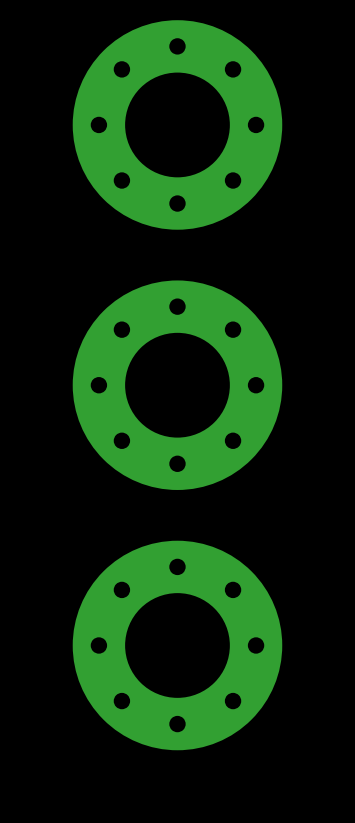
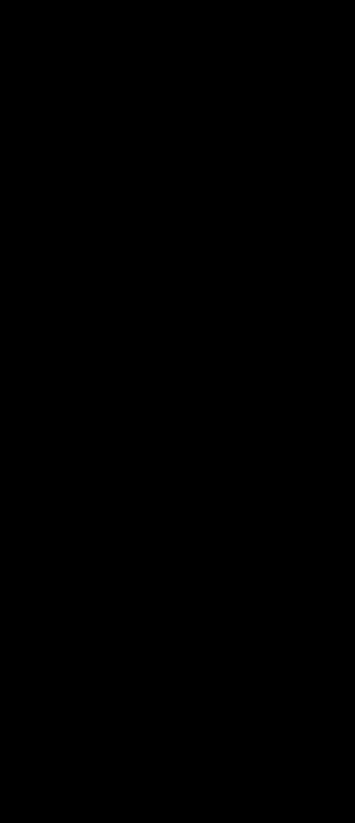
part: (177, 124) -> none
part: (177, 385) -> none
part: (177, 645) -> none

